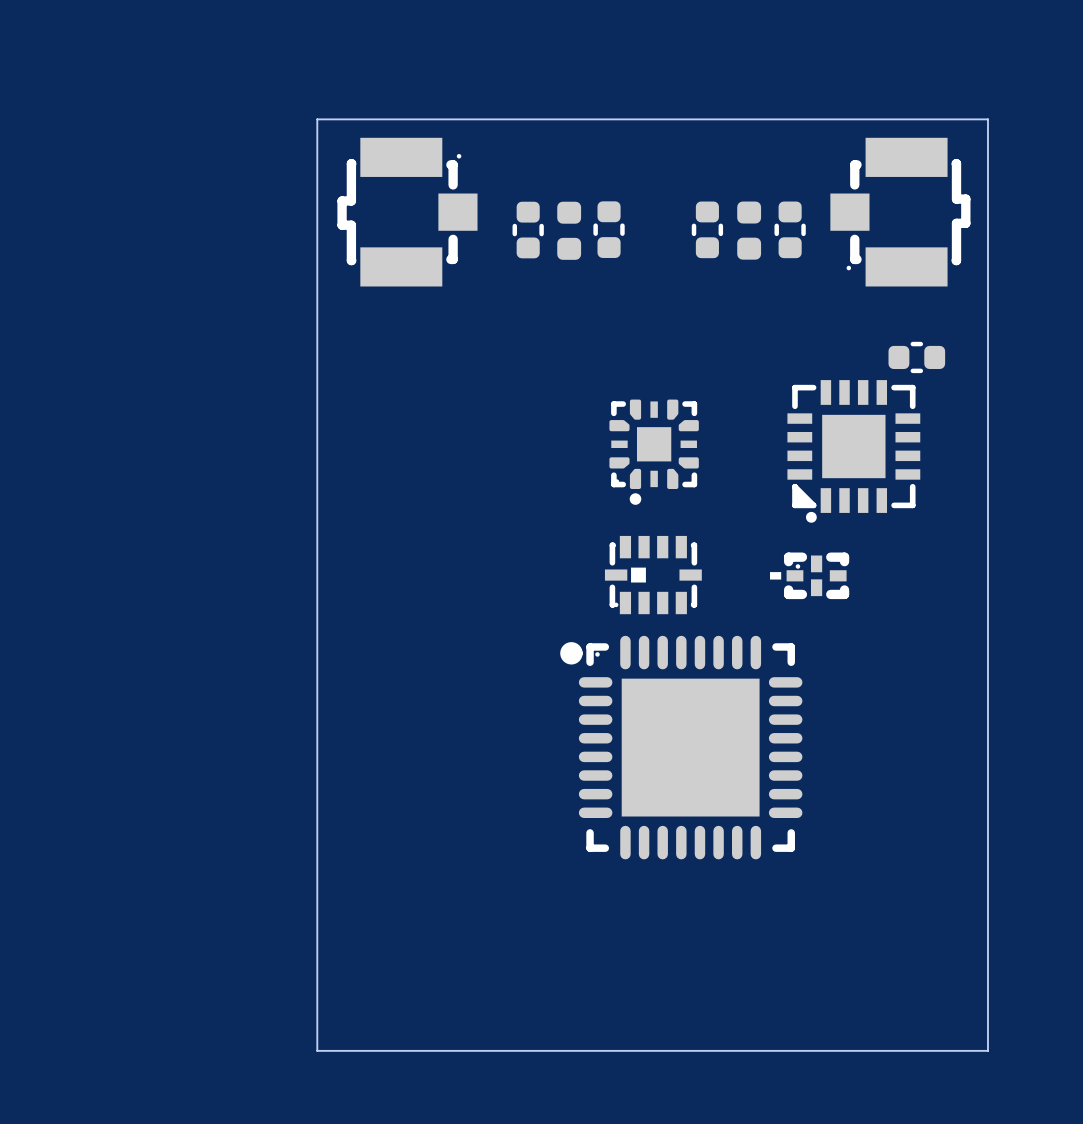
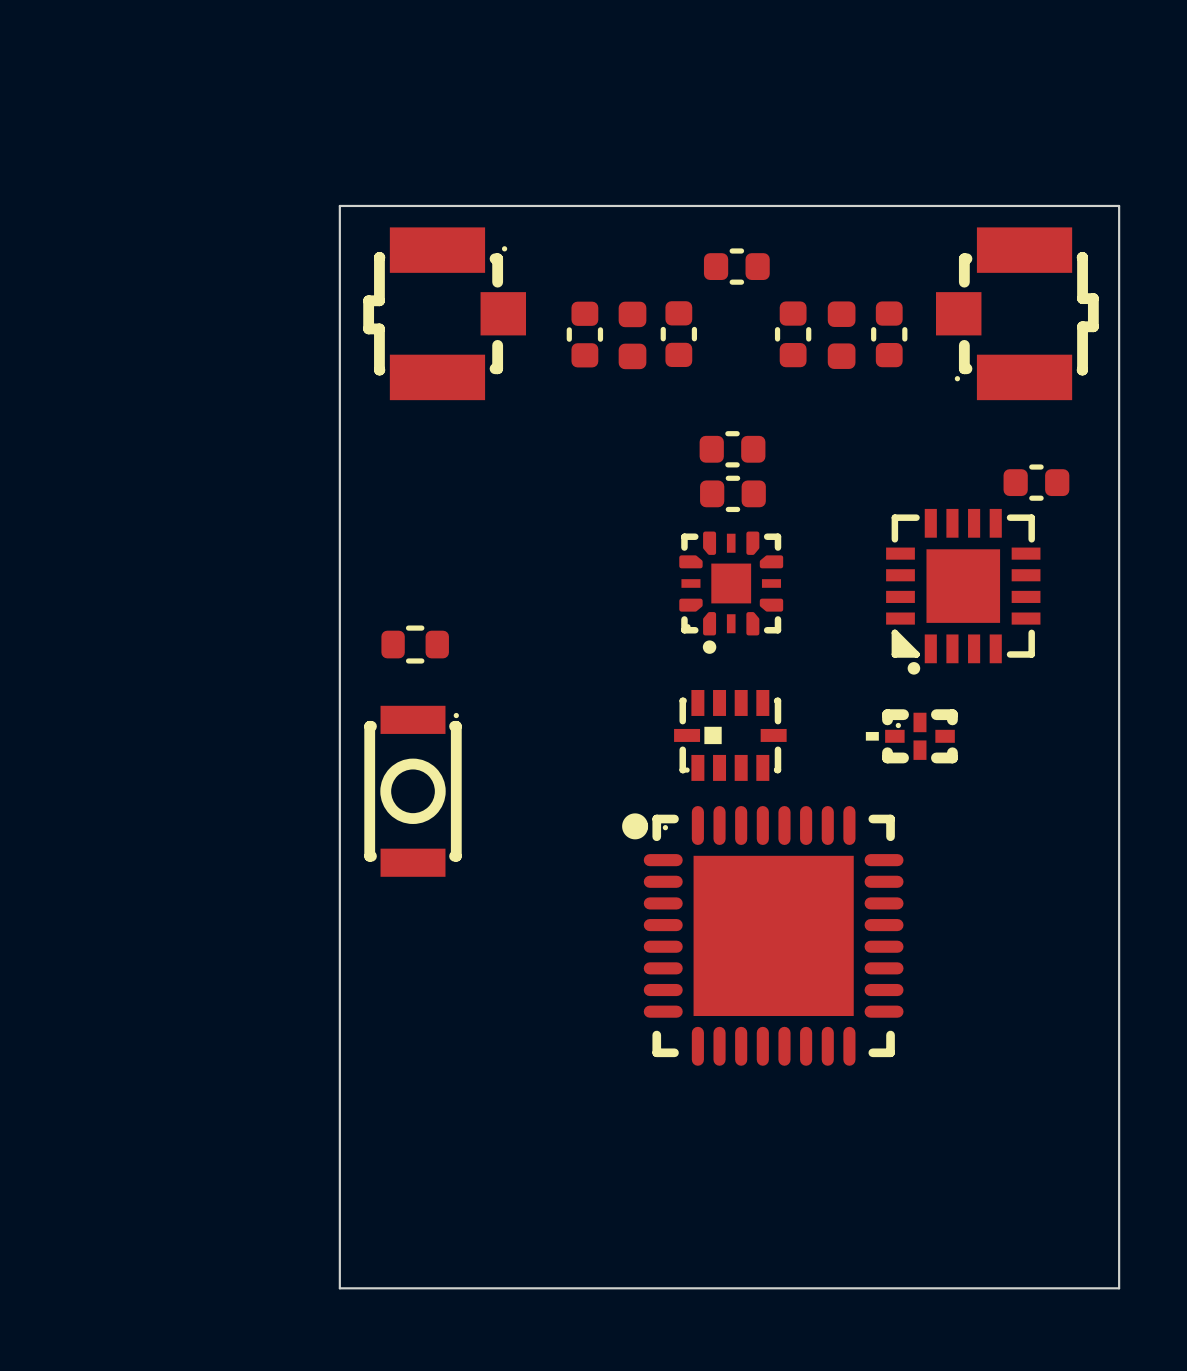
part: none -> (736, 266)
part: none -> (732, 449)
part: none -> (732, 493)
part: none -> (415, 644)
part: none -> (413, 791)

